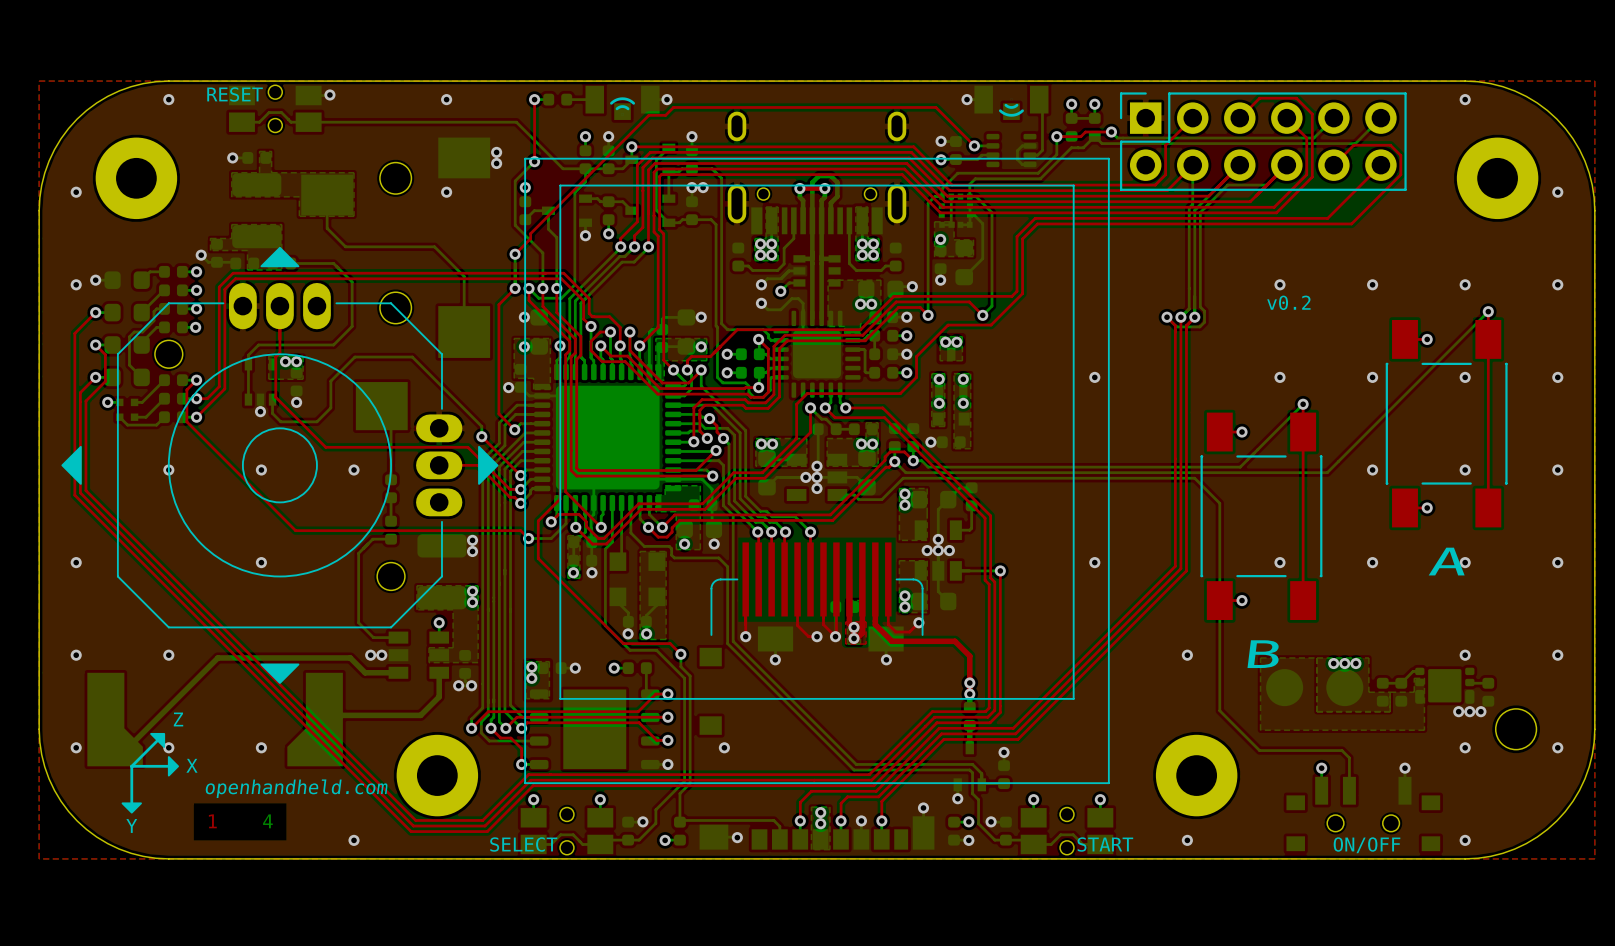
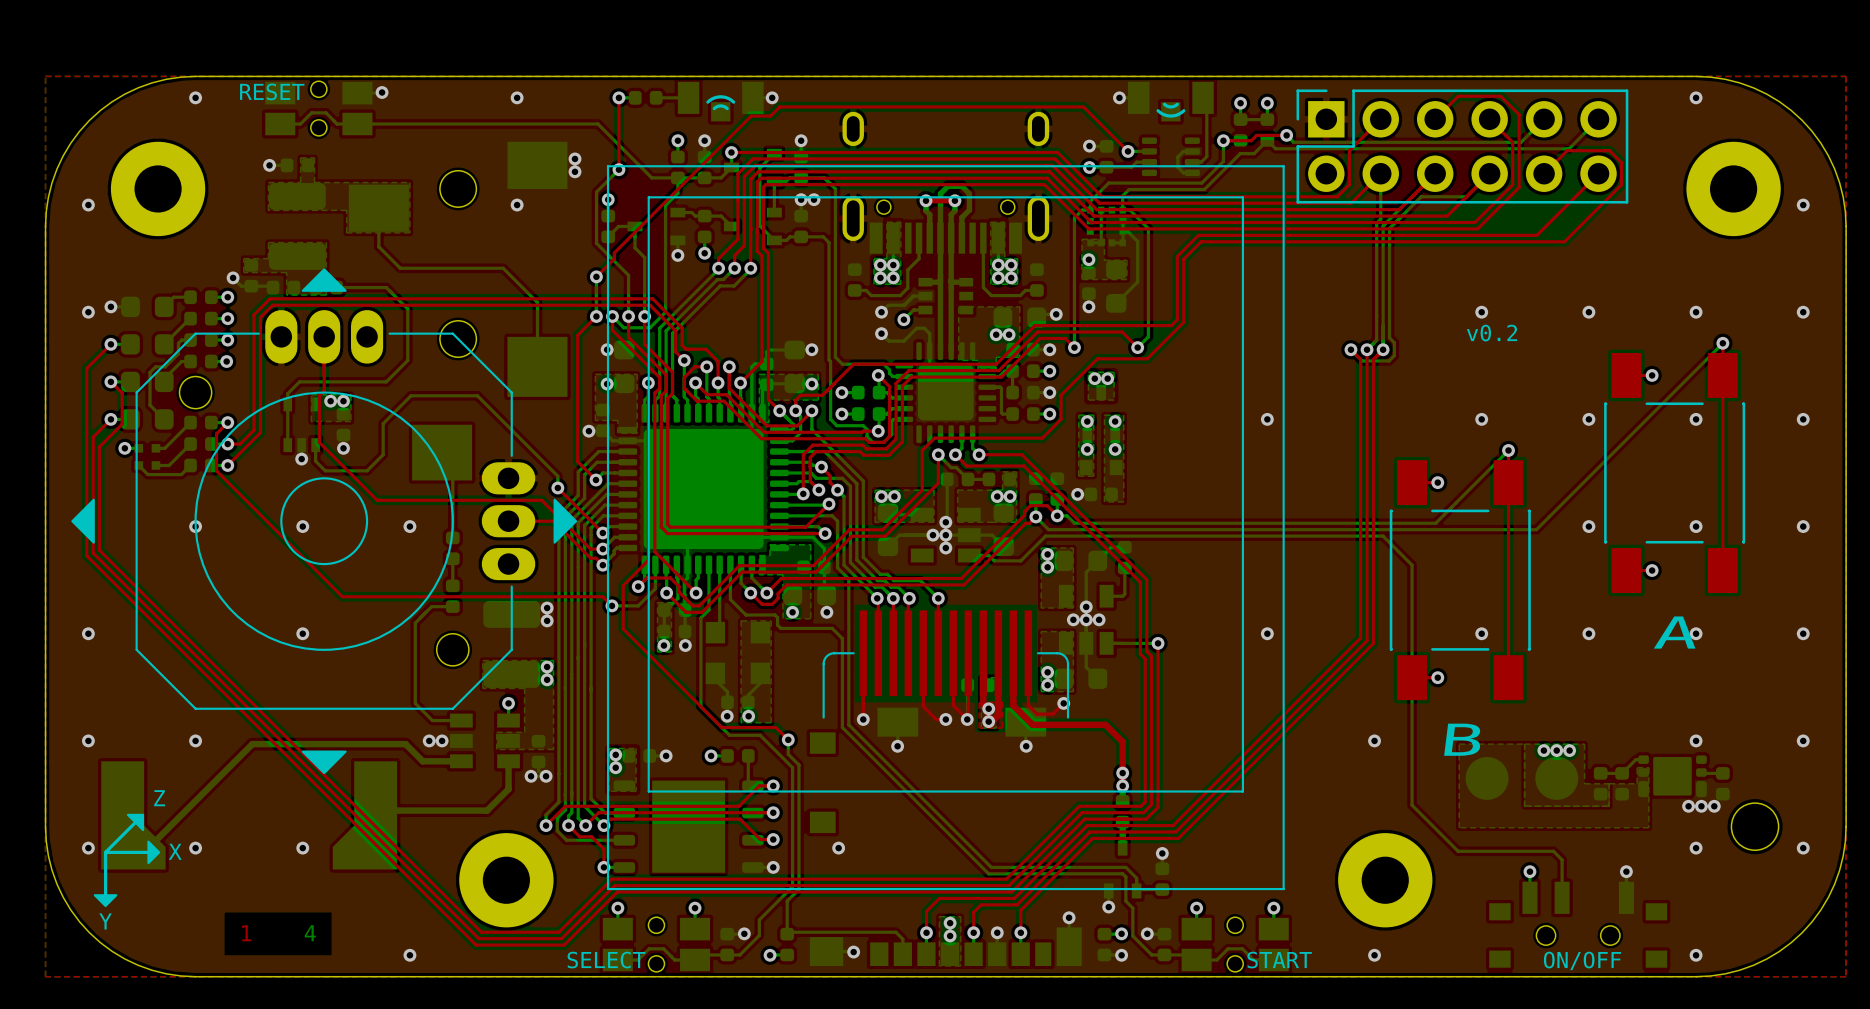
text position: Z (178, 719) -> Z (159, 798)
line: (159, 738) (131, 766) -> (137, 820) (105, 852)
drawing position: (157, 740) -> (135, 822)
text position: X (191, 765) -> X (175, 851)
line: (131, 766) (168, 766) -> (105, 852) (148, 852)
line: (131, 766) (131, 803) -> (105, 852) (105, 895)
drawing position: (173, 766) -> (153, 852)
text: openhandheld.com (296, 788) -> none
drawing position: (131, 807) -> (105, 900)
text position: Y (131, 825) -> Y (105, 921)

